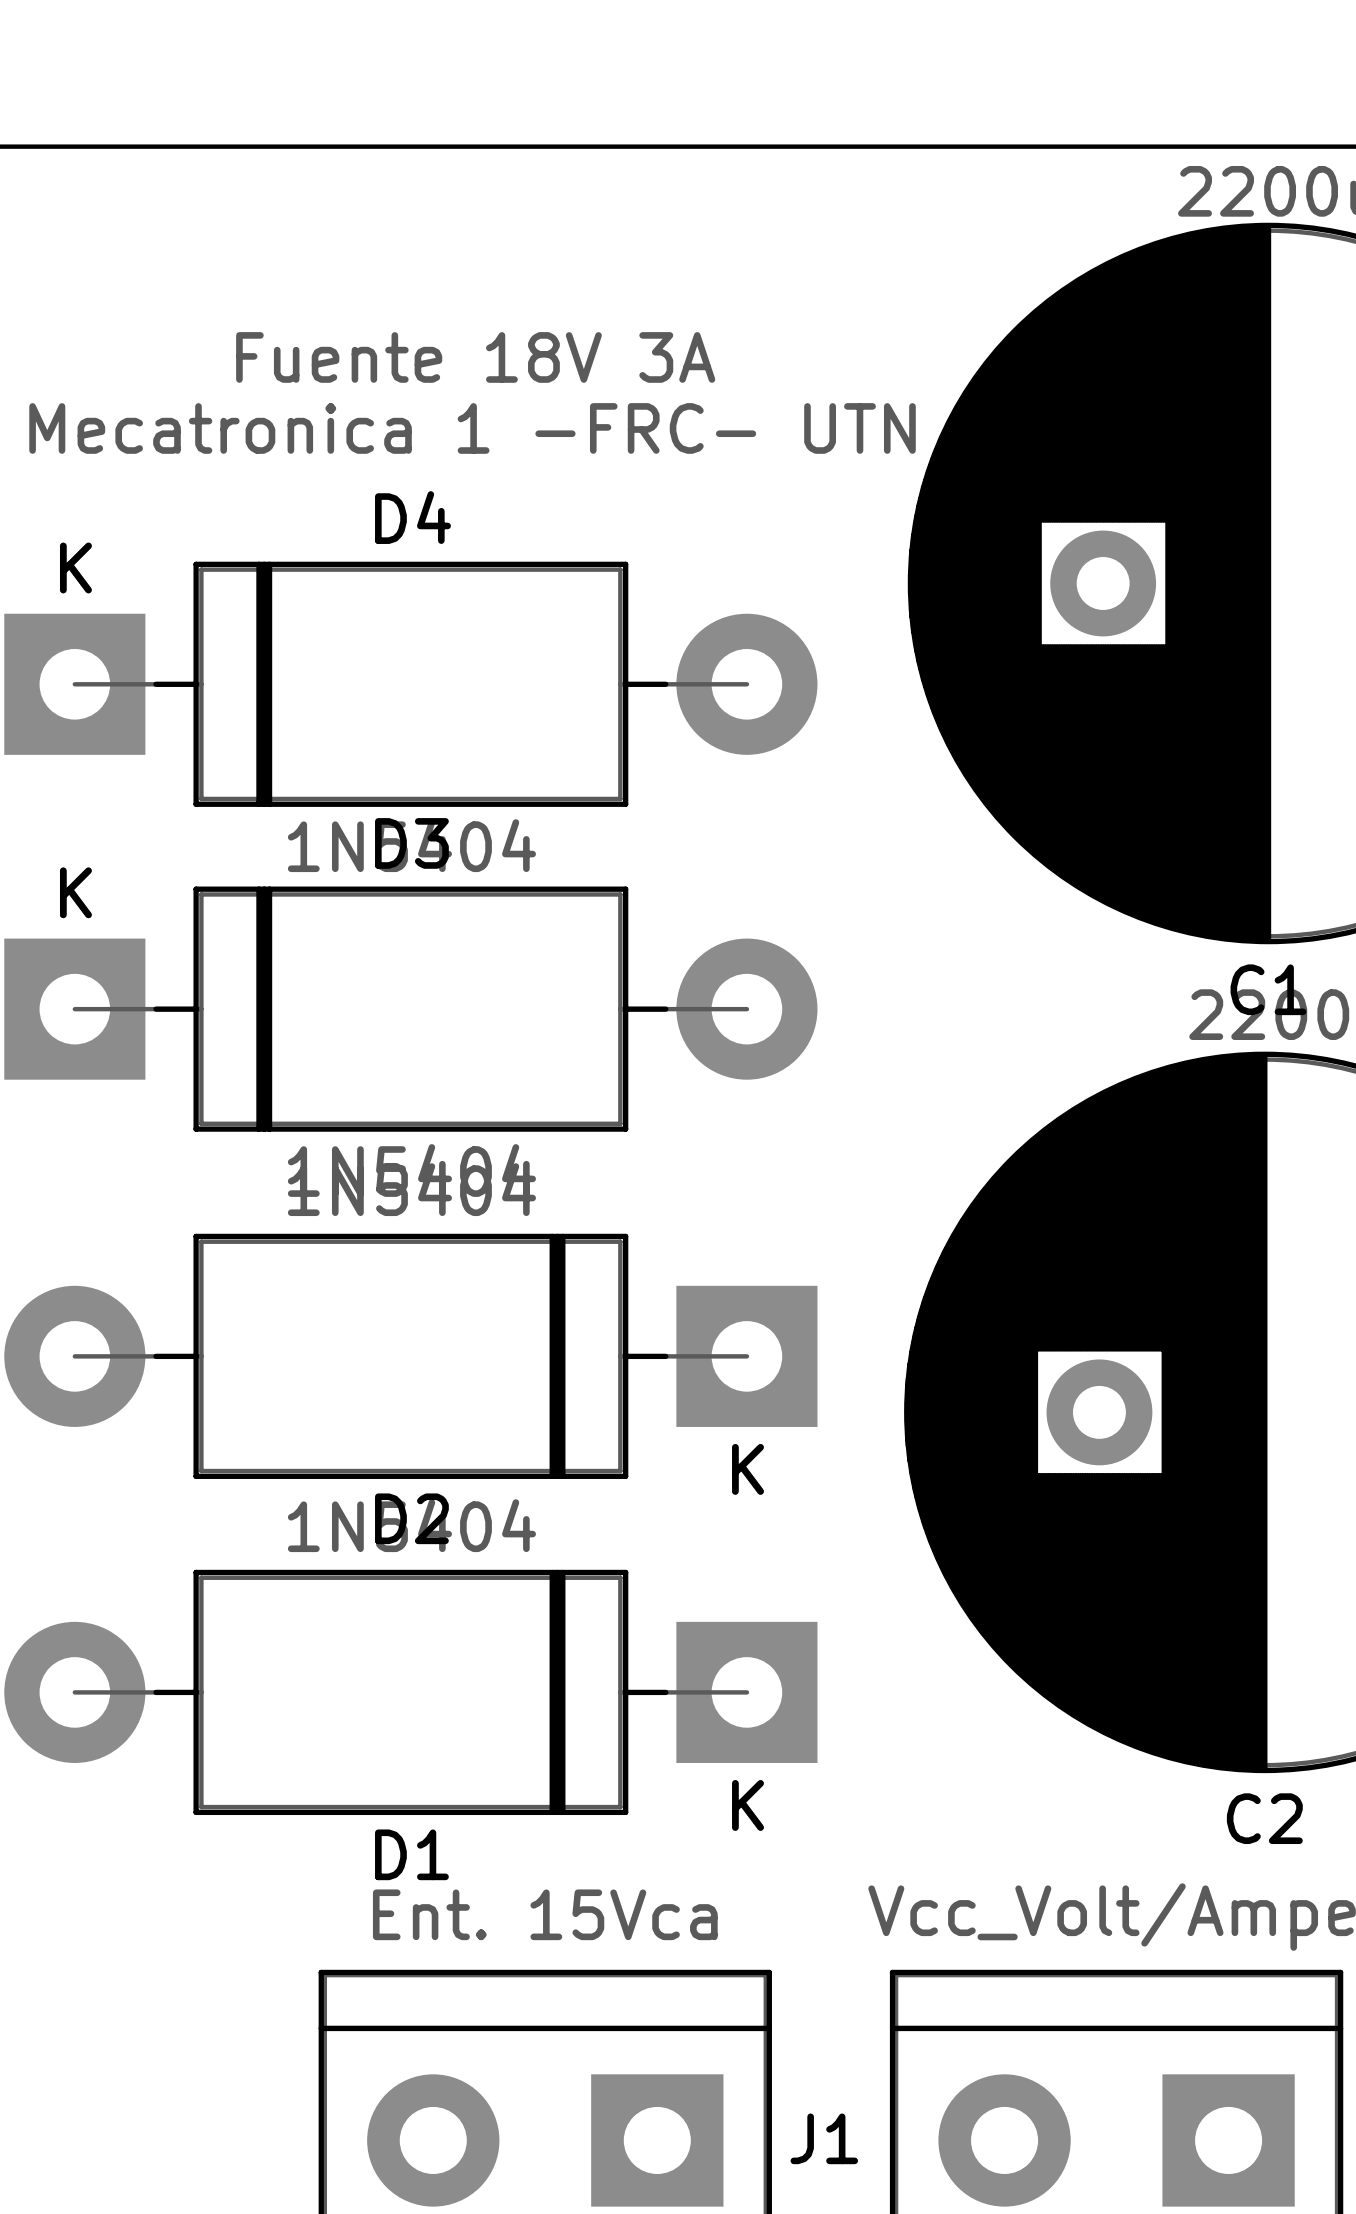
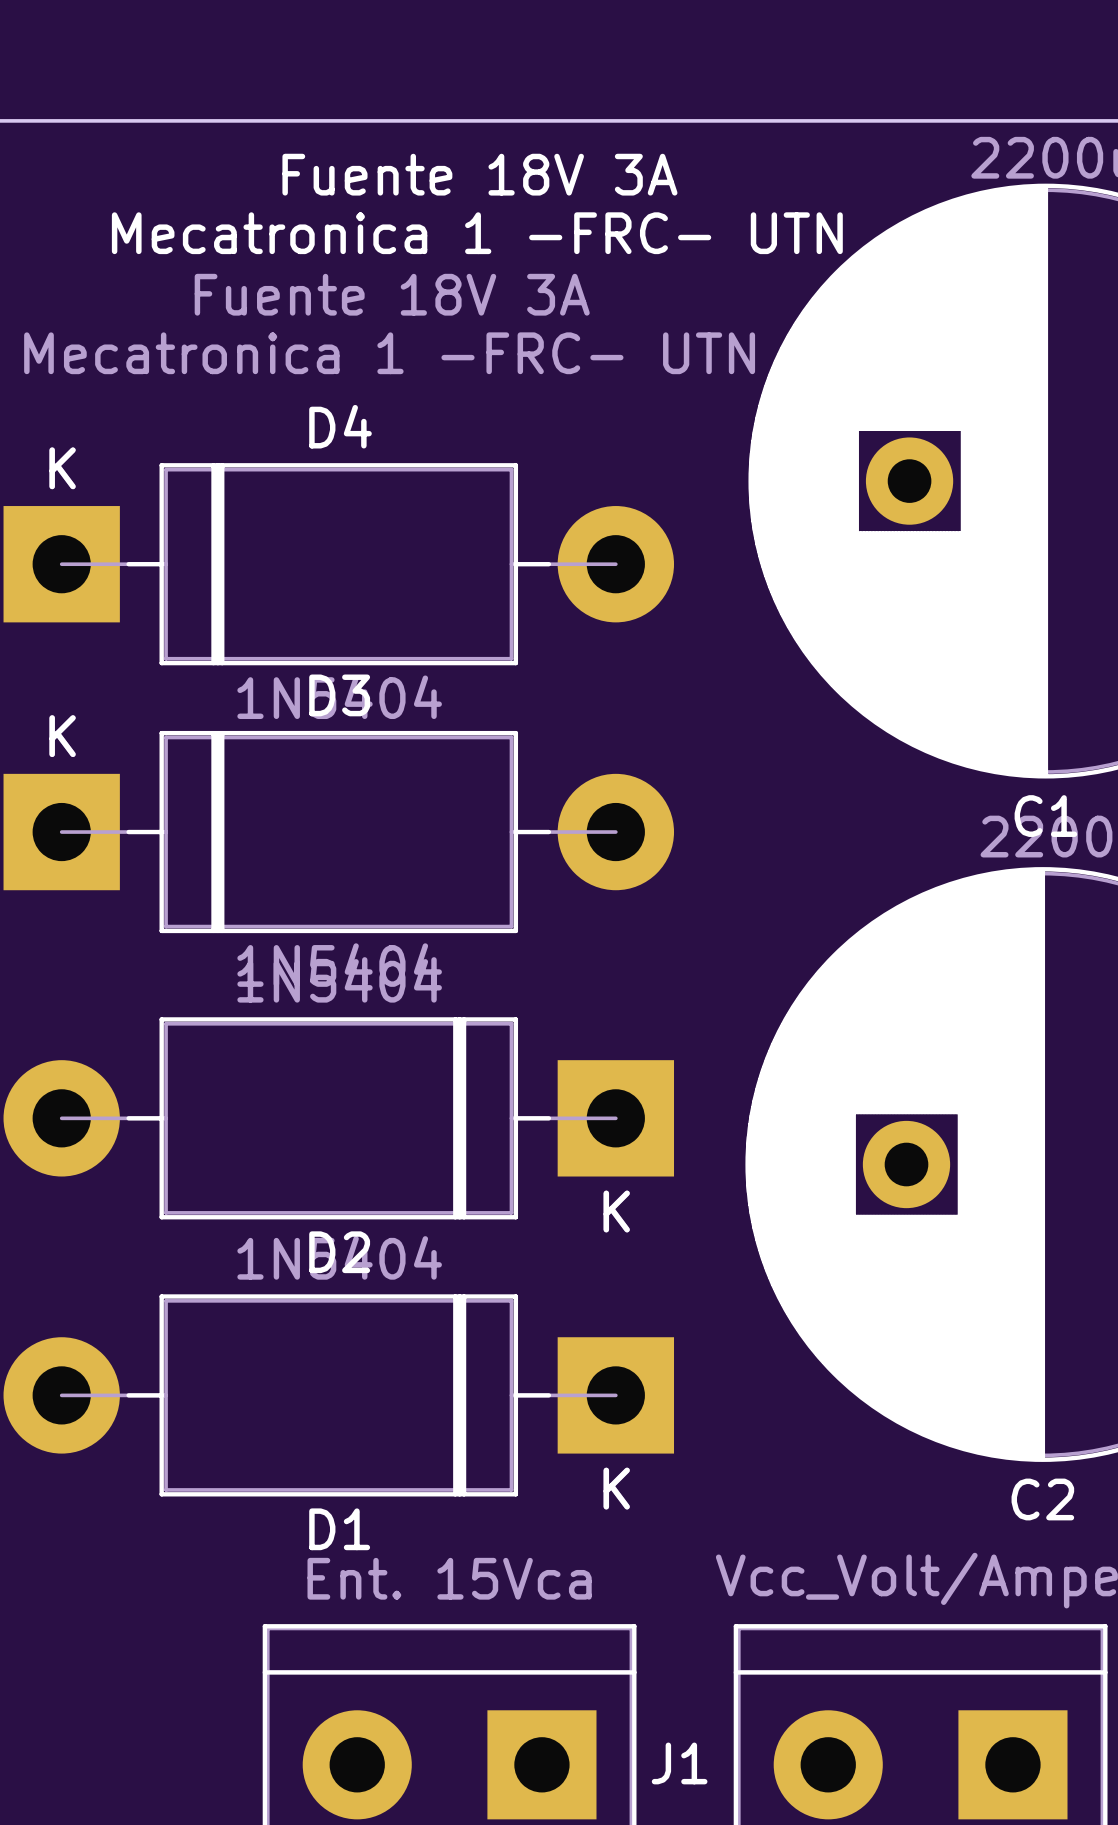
text: none -> Fuente 18V 3A (479, 174)
text: none -> Mecatronica 1 -FRC- UTN (477, 233)

